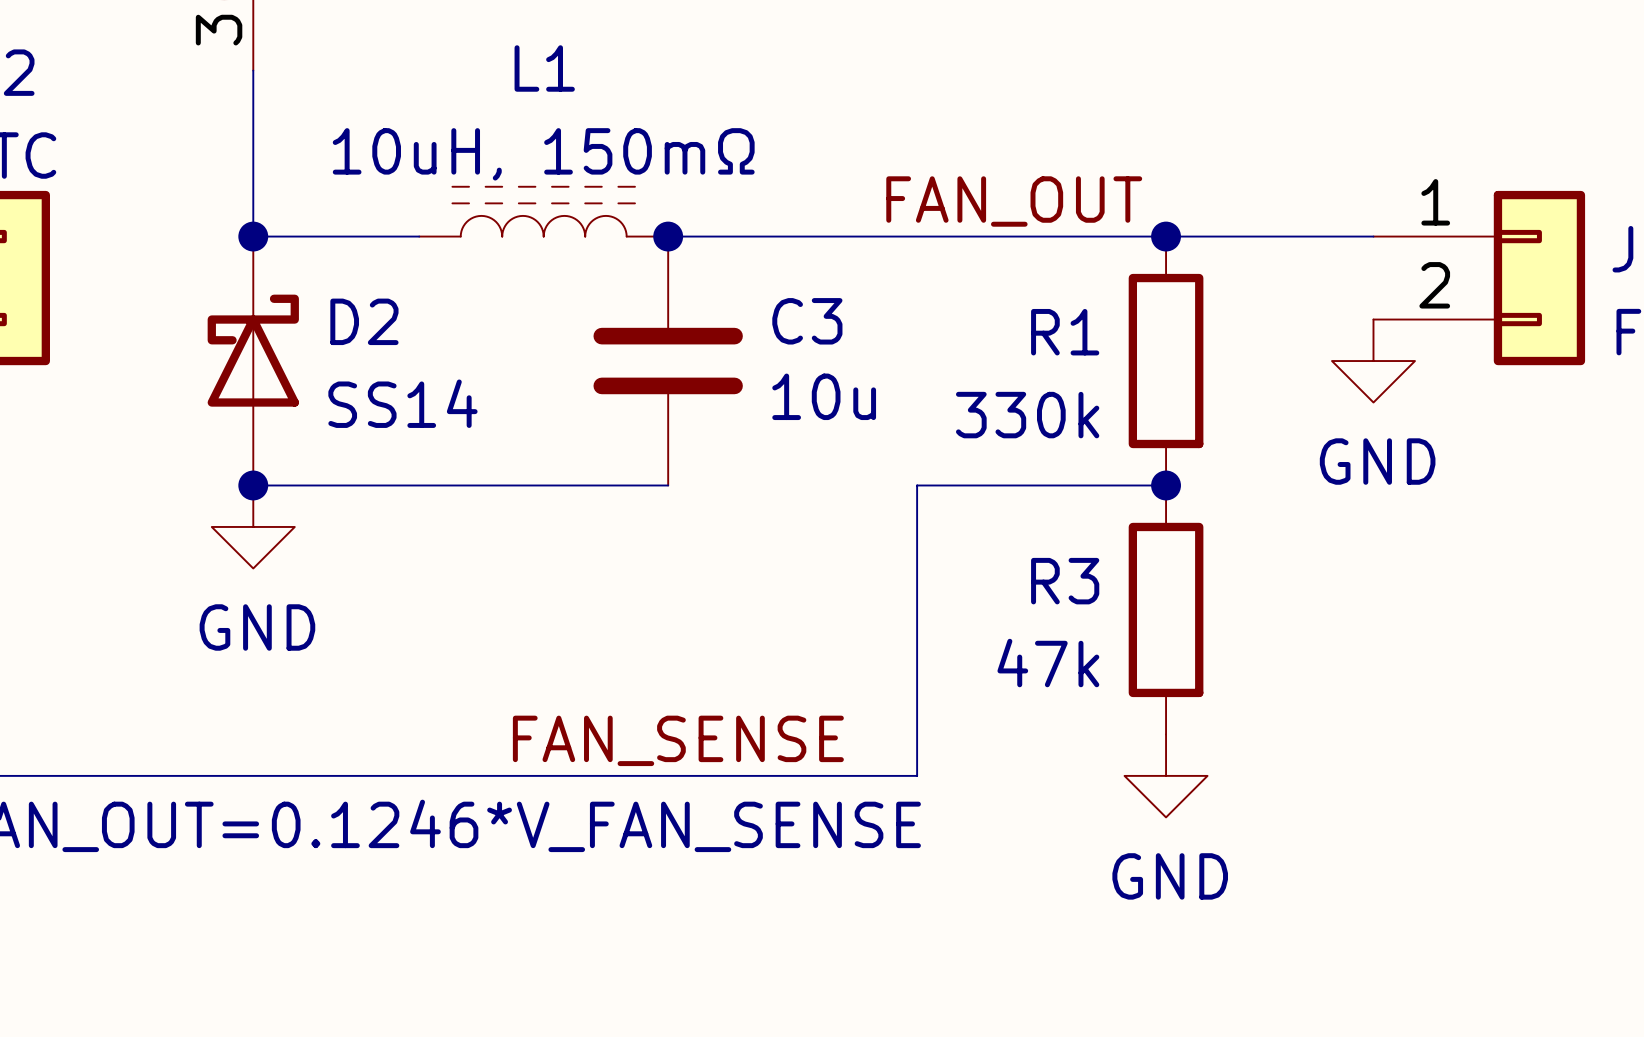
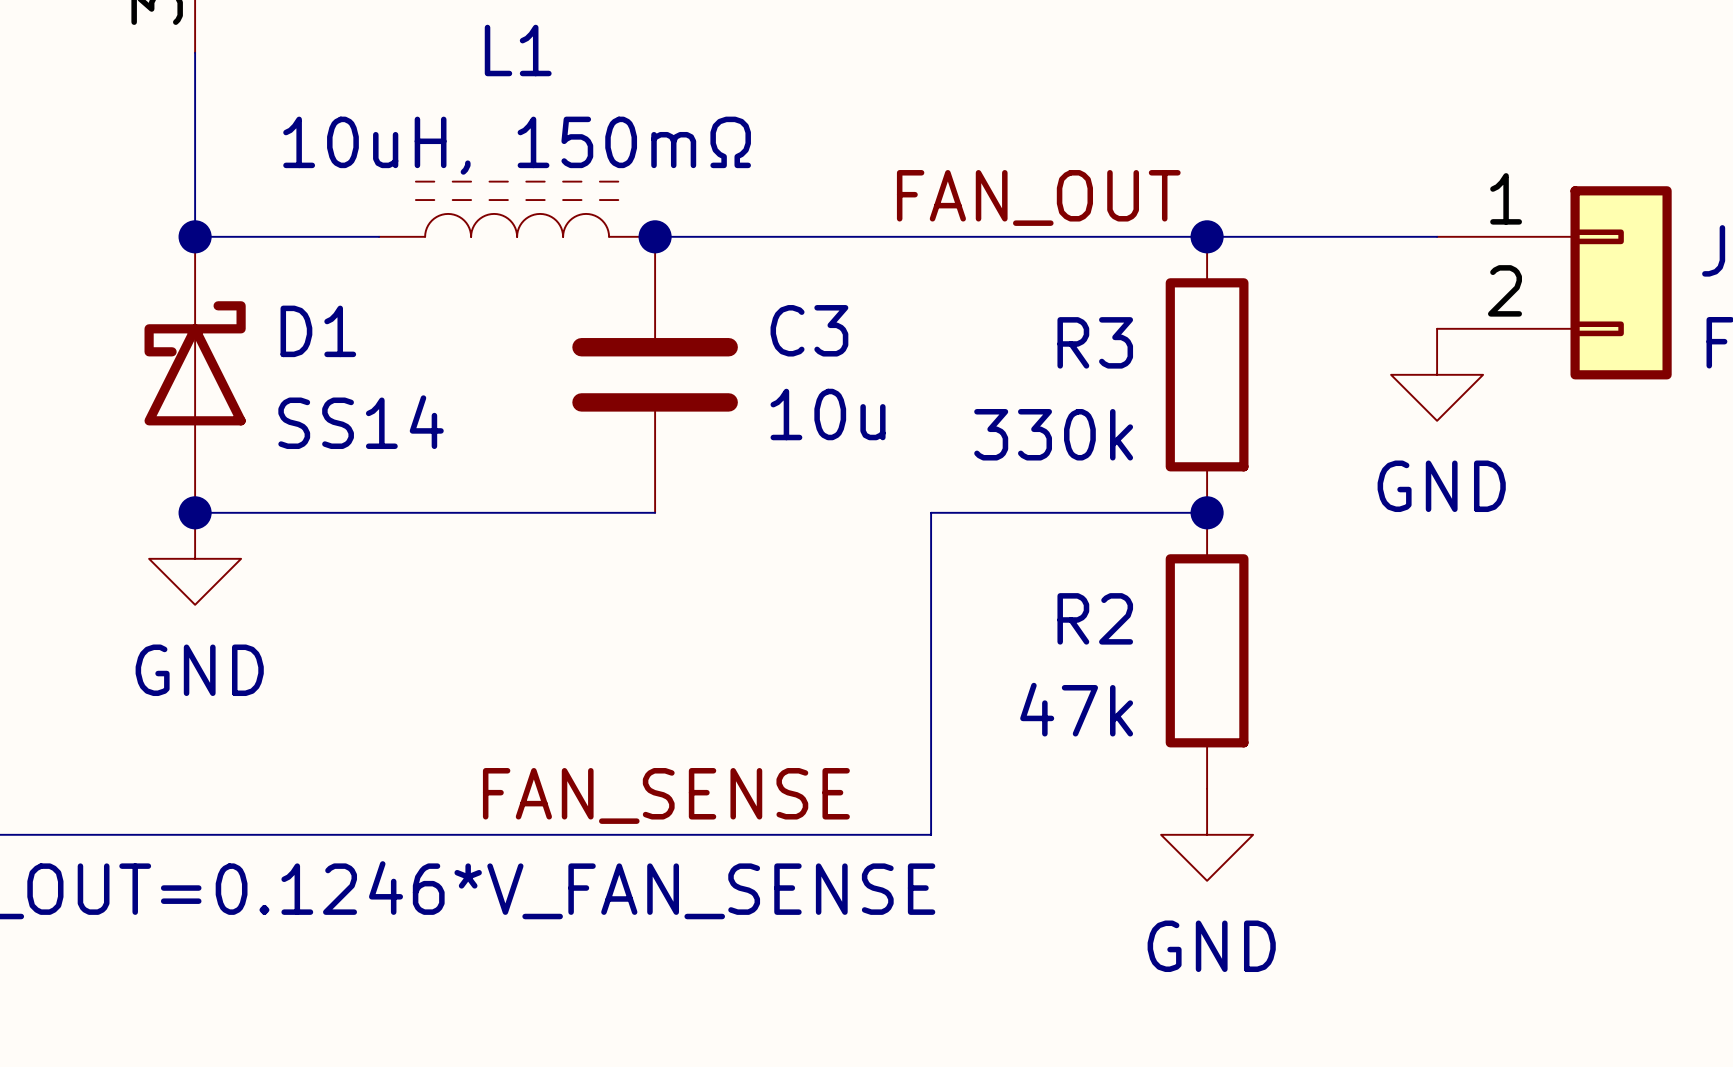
D2 name: D2 (364, 321) -> D1 (318, 331)
R1 name: R1 (1065, 332) -> R3 (1095, 342)
R3 name: R3 (1065, 581) -> R2 (1095, 618)

